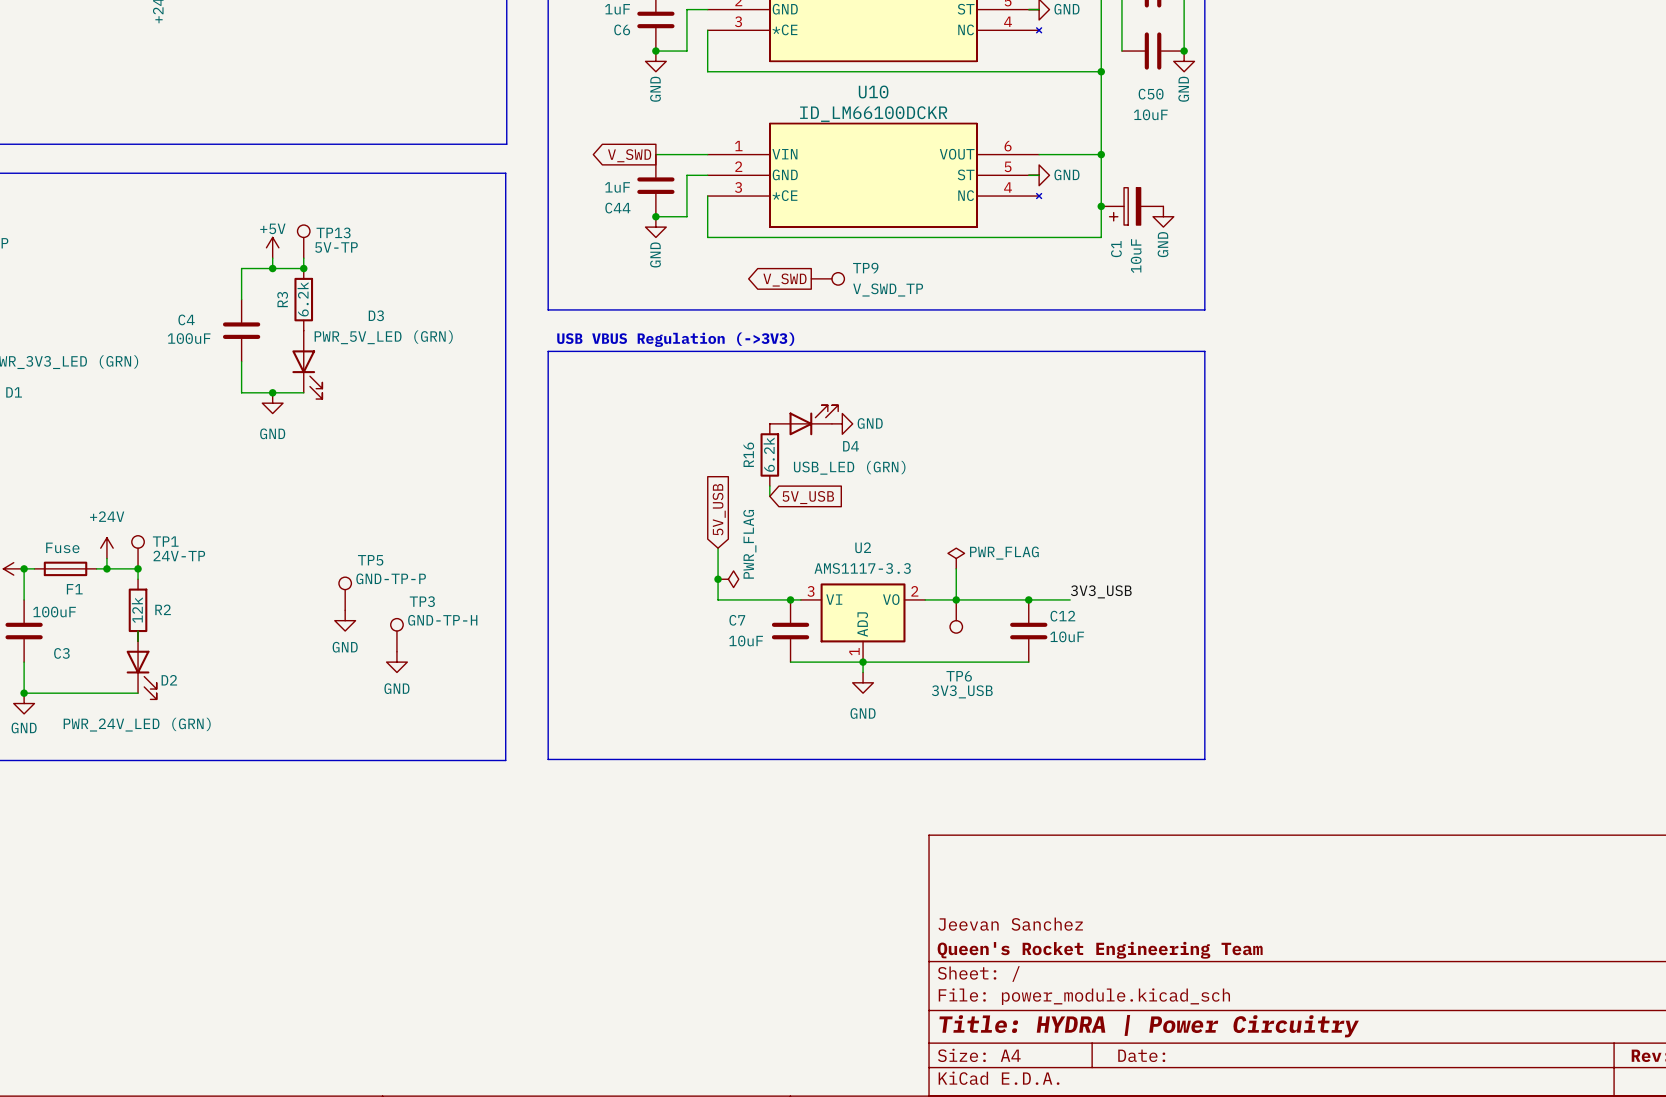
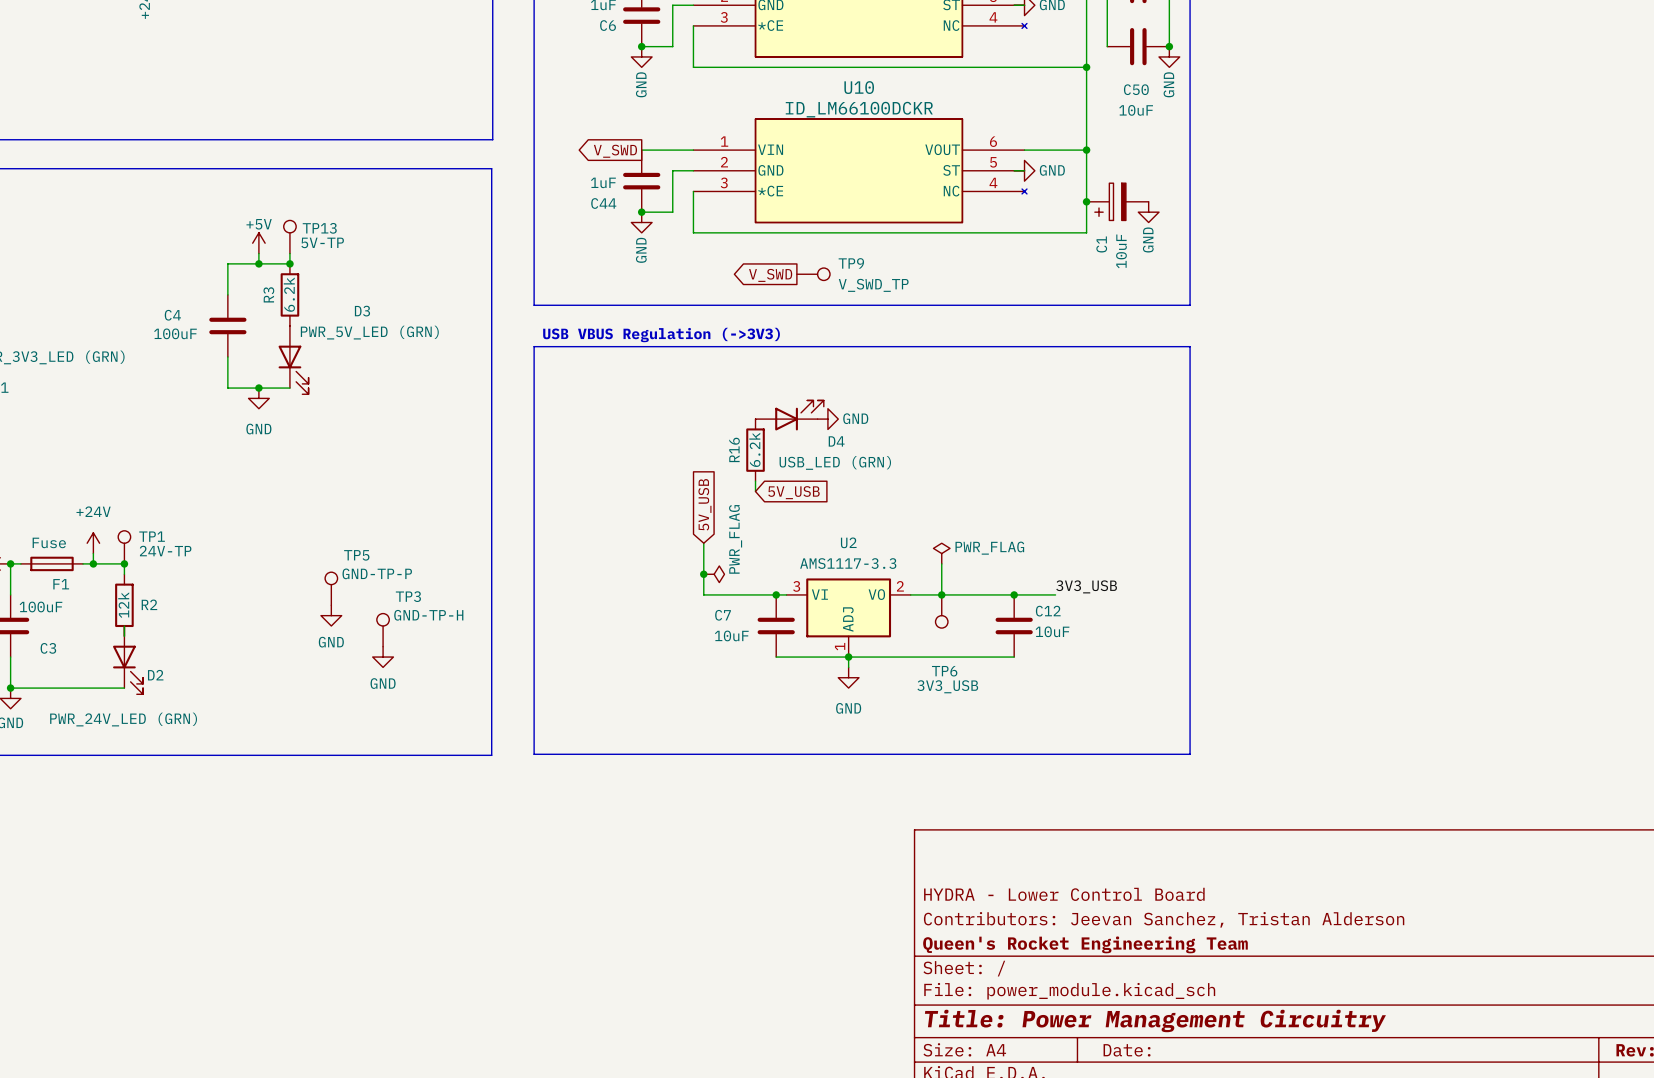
title block: none -> HYDRA - Lower Control Board (1064, 894)
title block: Jeevan Sanchez (1010, 924) -> Contributors: Jeevan Sanchez, Tristan Alderson (1164, 919)
title block: Title: HYDRA | Power Circuitry (1149, 1026) -> Title: Power Management Circuitry (1155, 1020)

